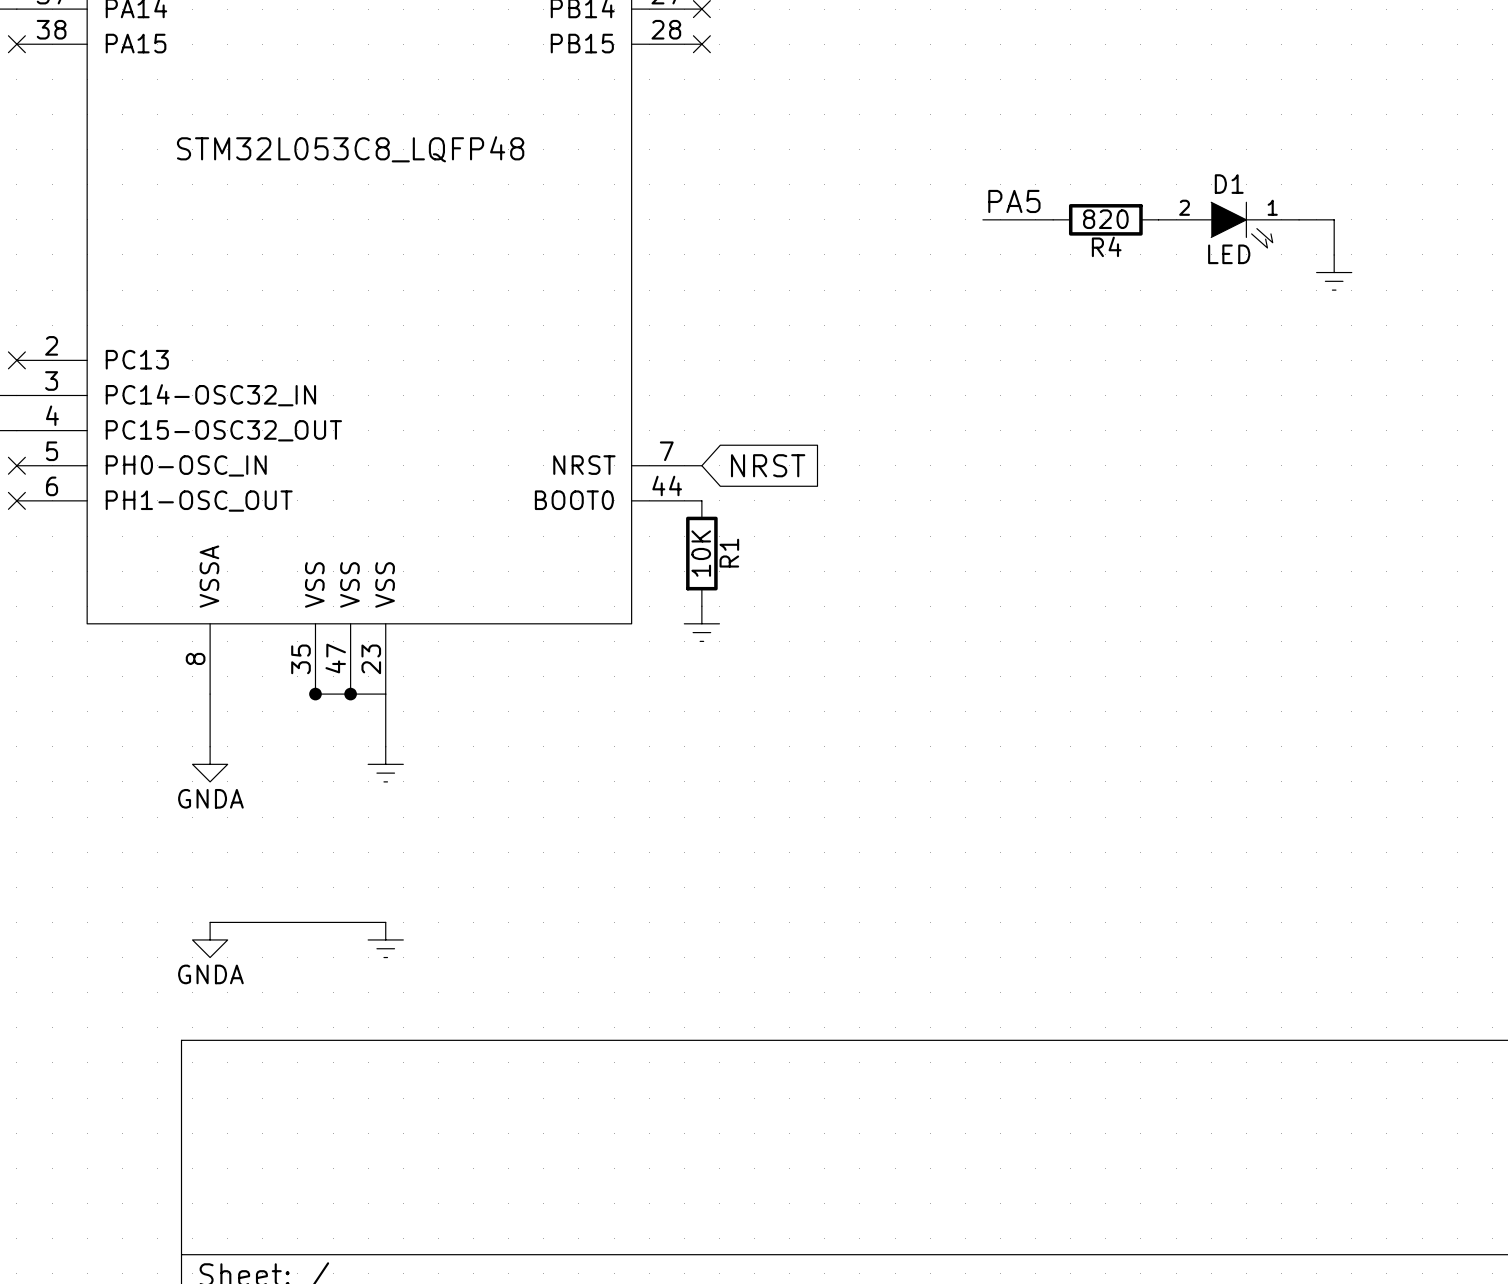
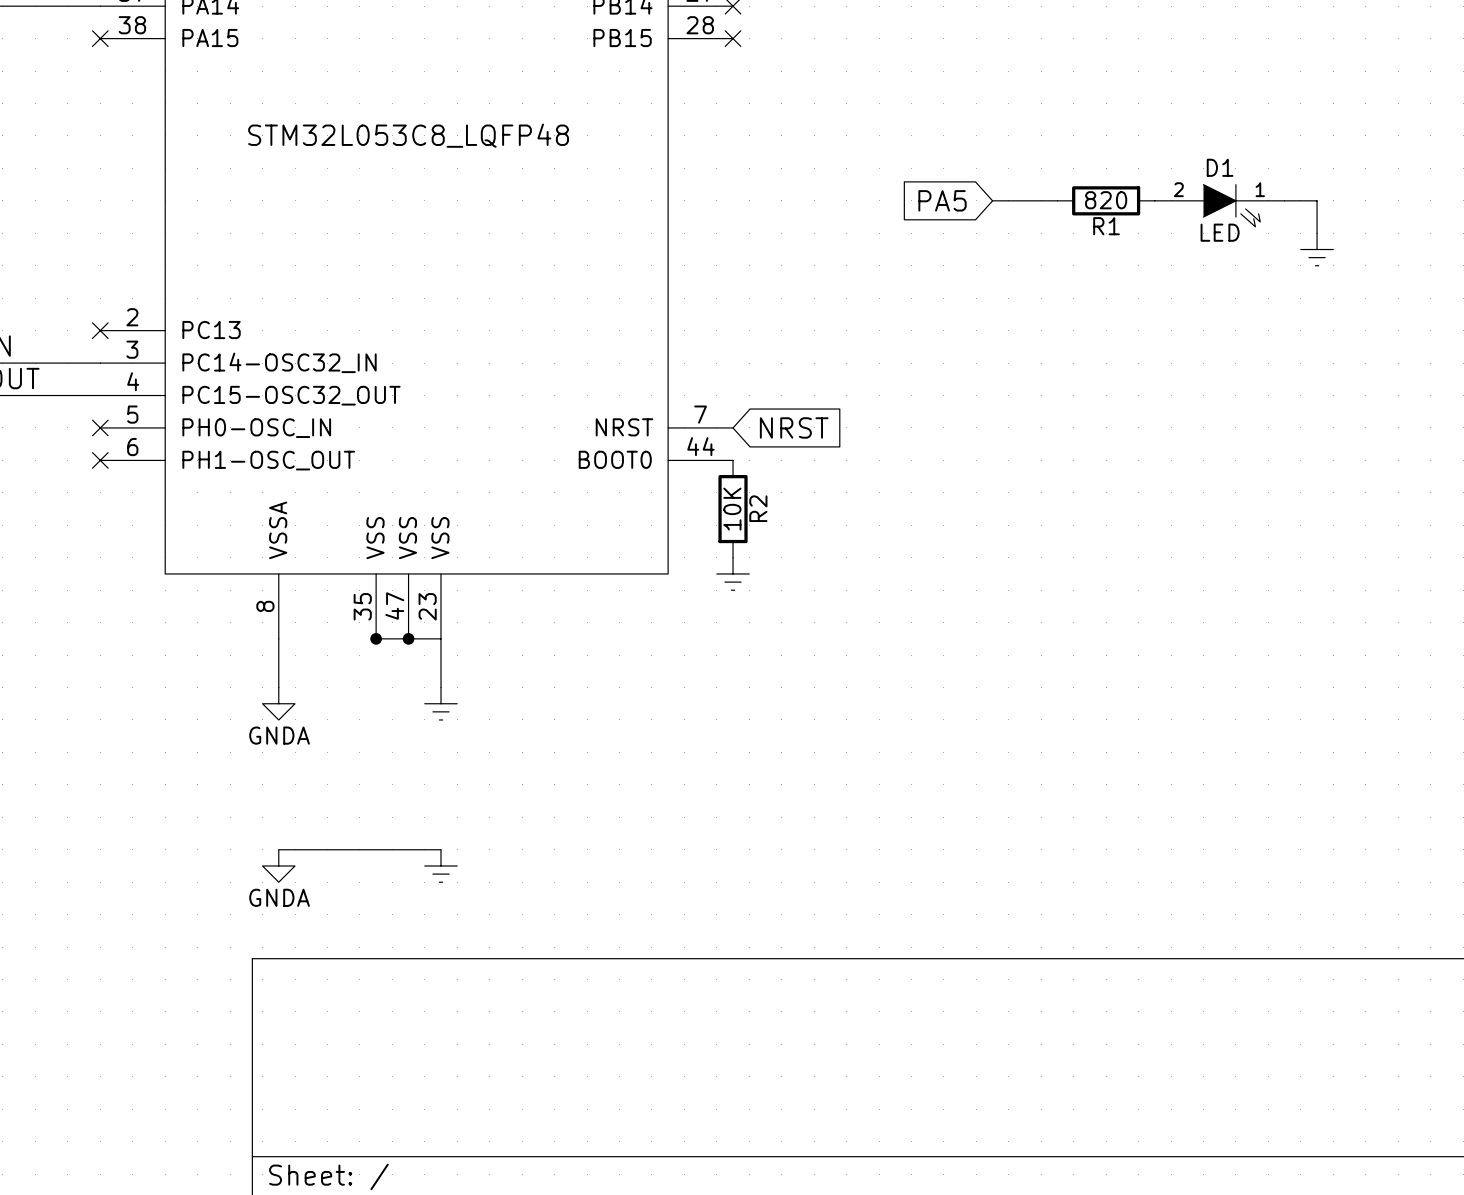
label: PA5 (1014, 201) -> none
global label: none -> PA5 (942, 200)
R4 name: R4 (1106, 246) -> R1 (1106, 226)
R1 name: R1 (729, 553) -> R2 (758, 508)

